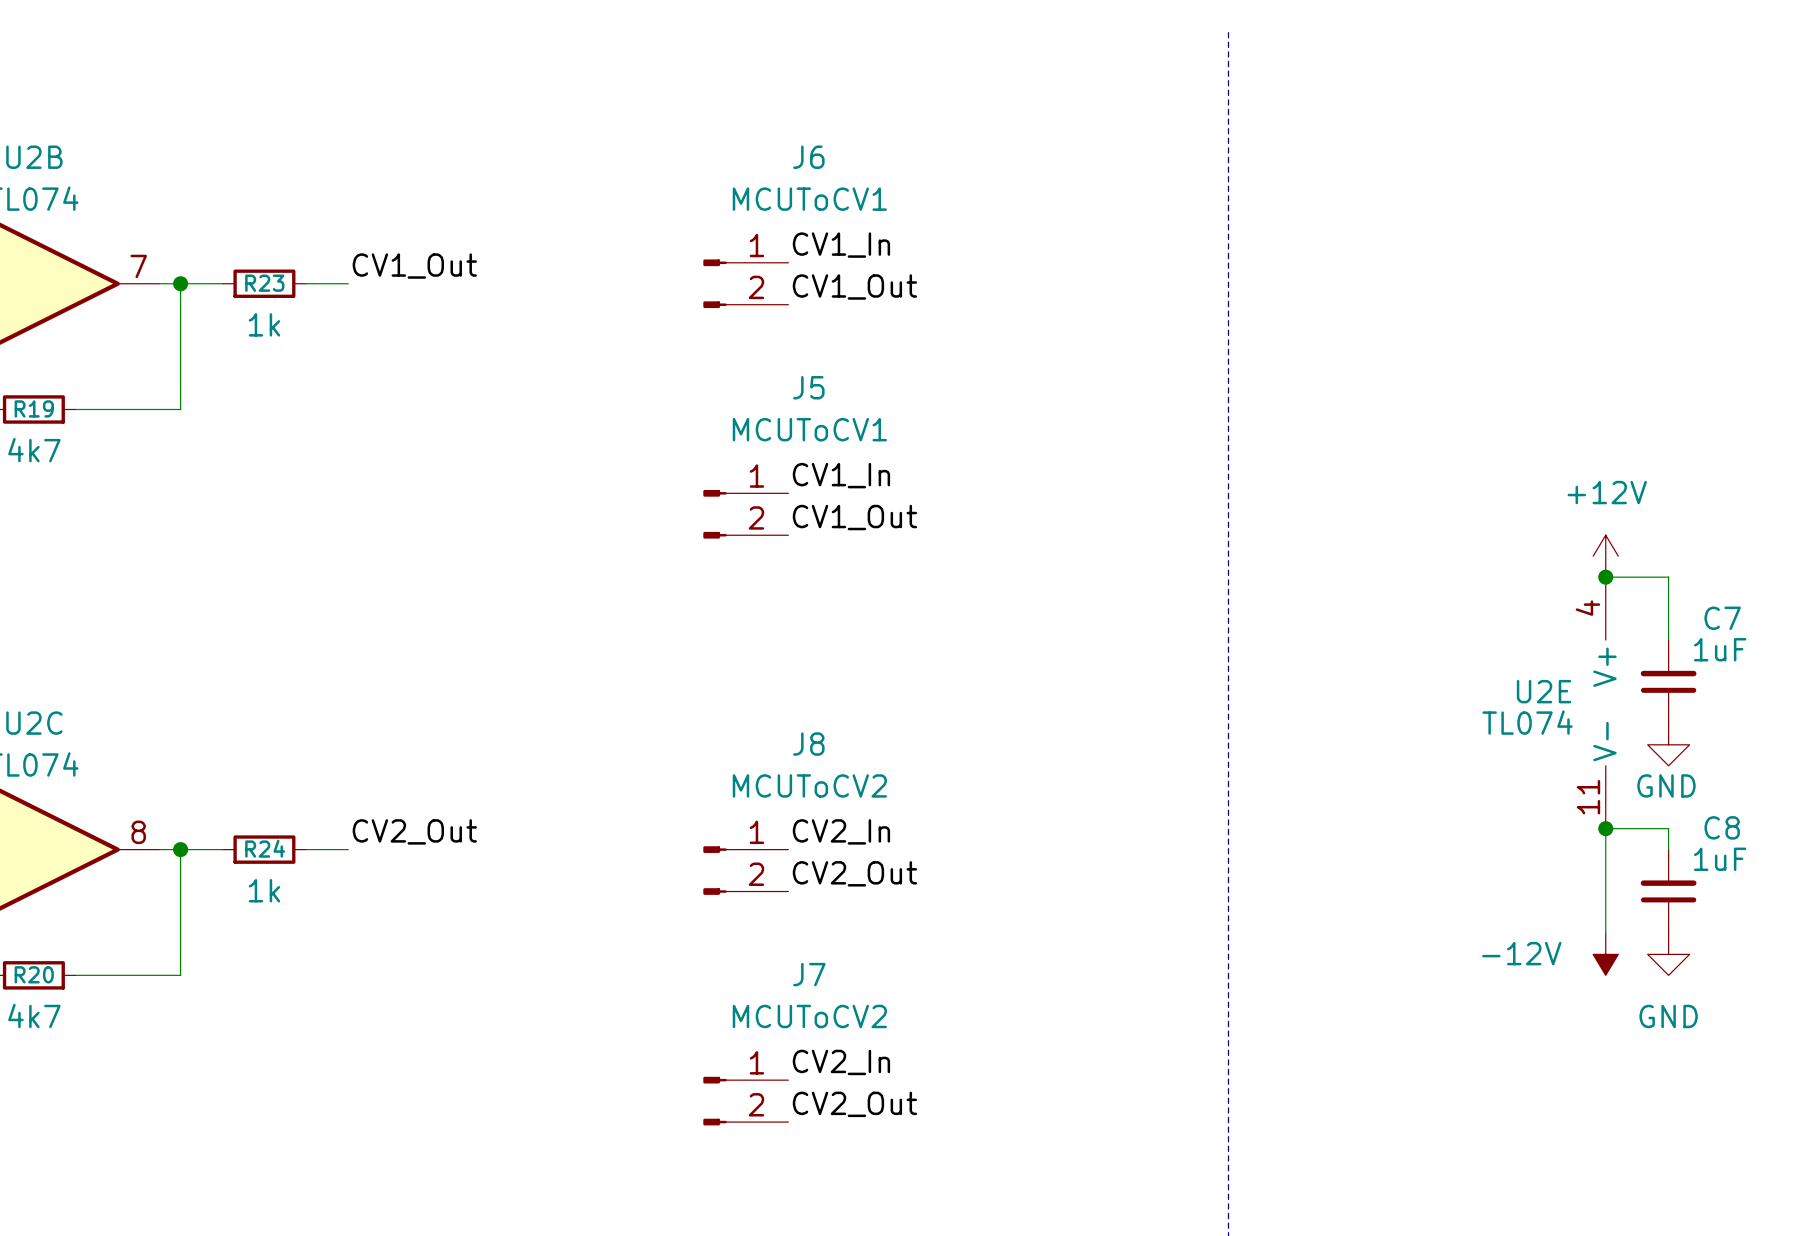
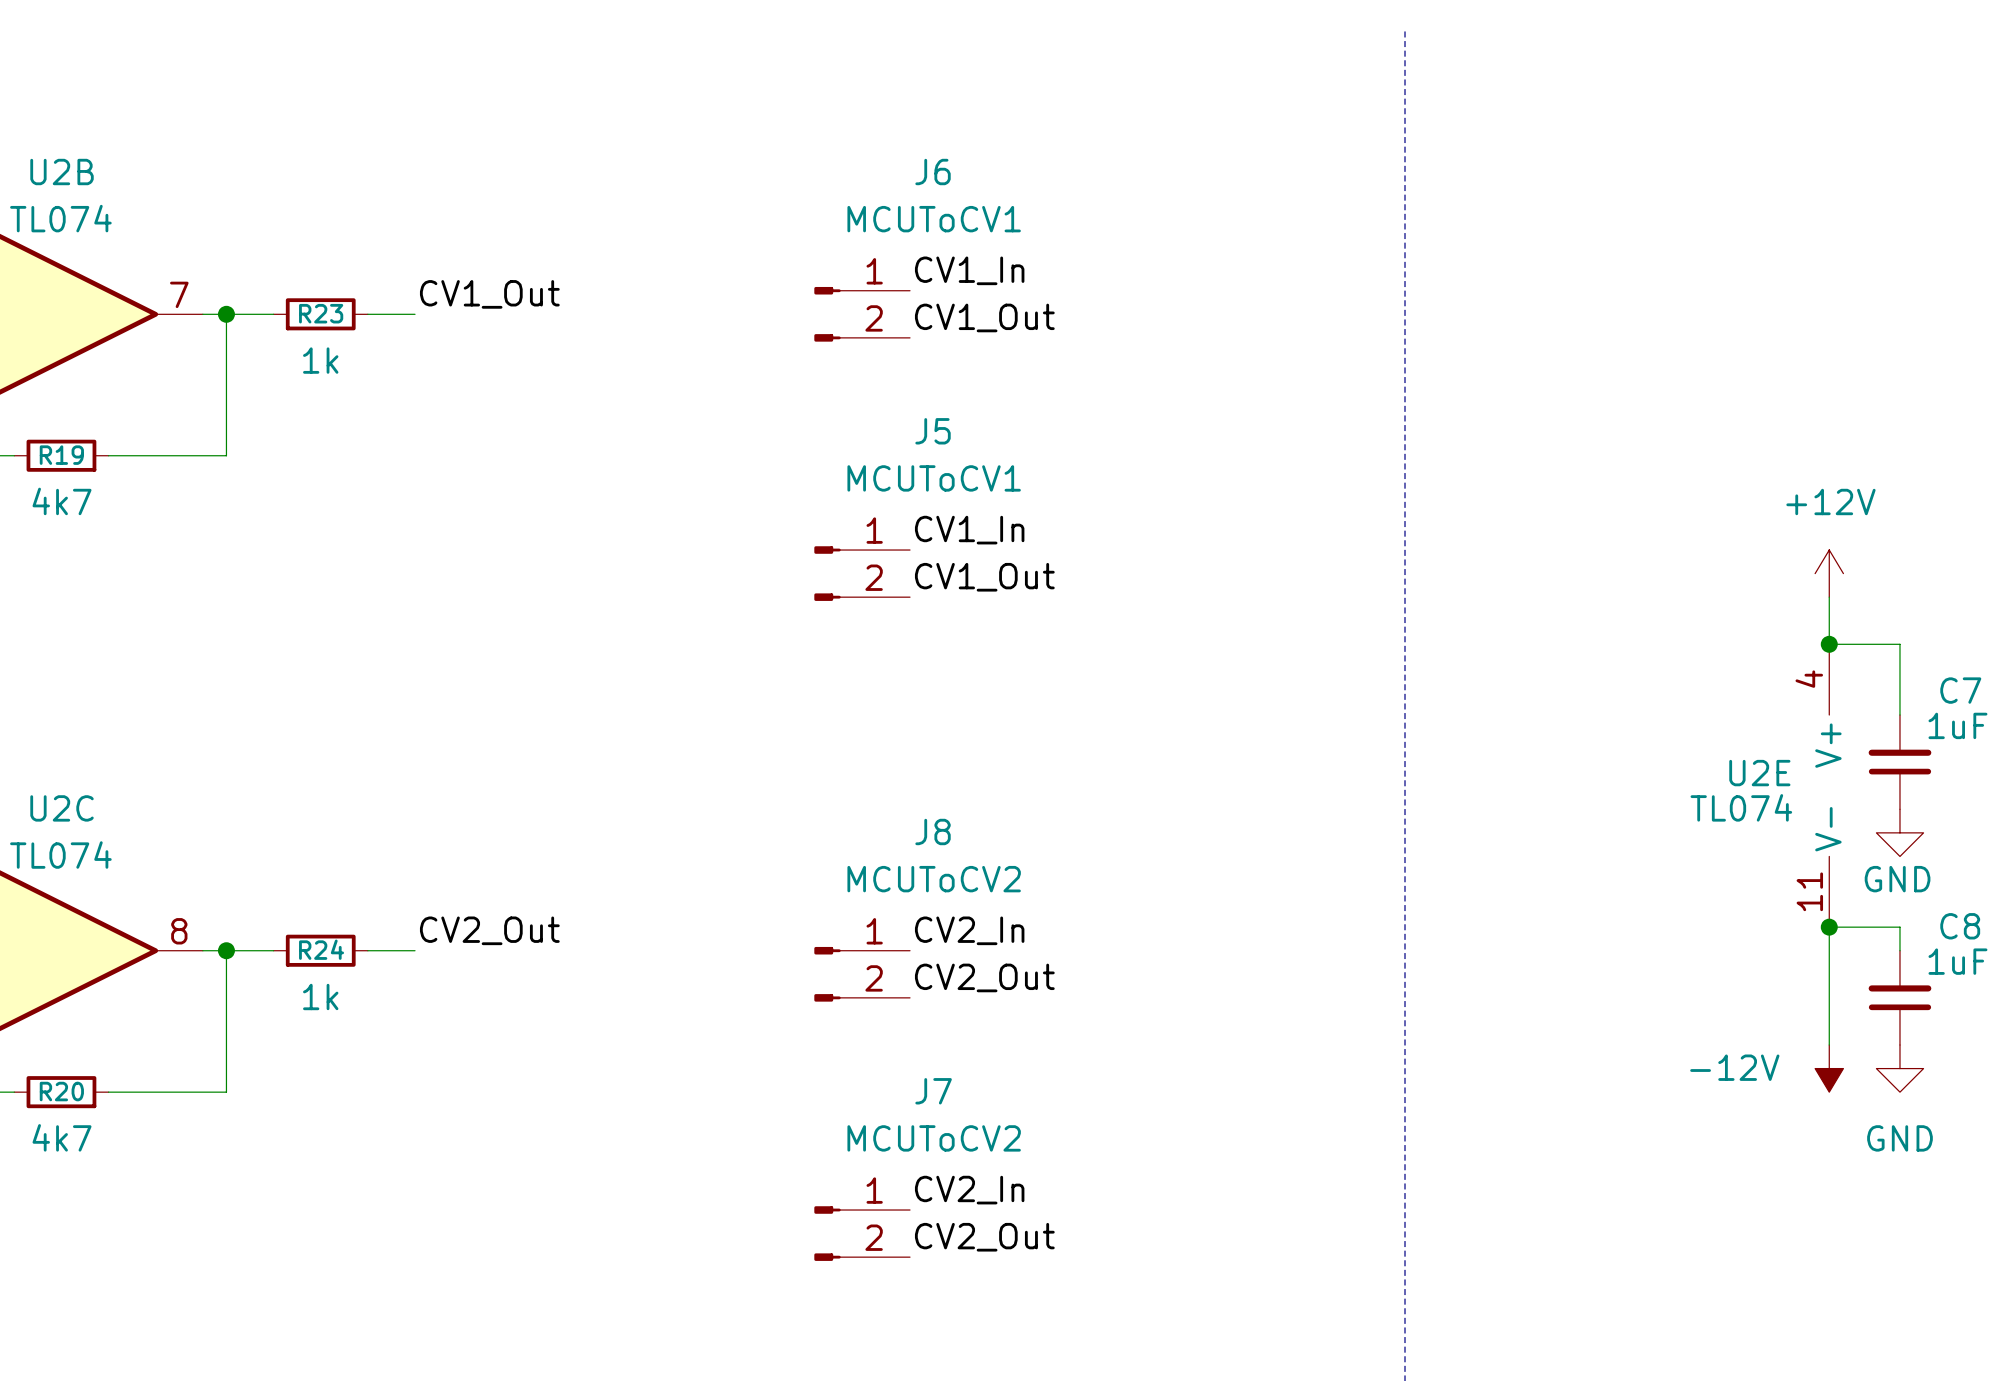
power symbol position: +12V (1605, 556) -> +12V (1829, 573)

